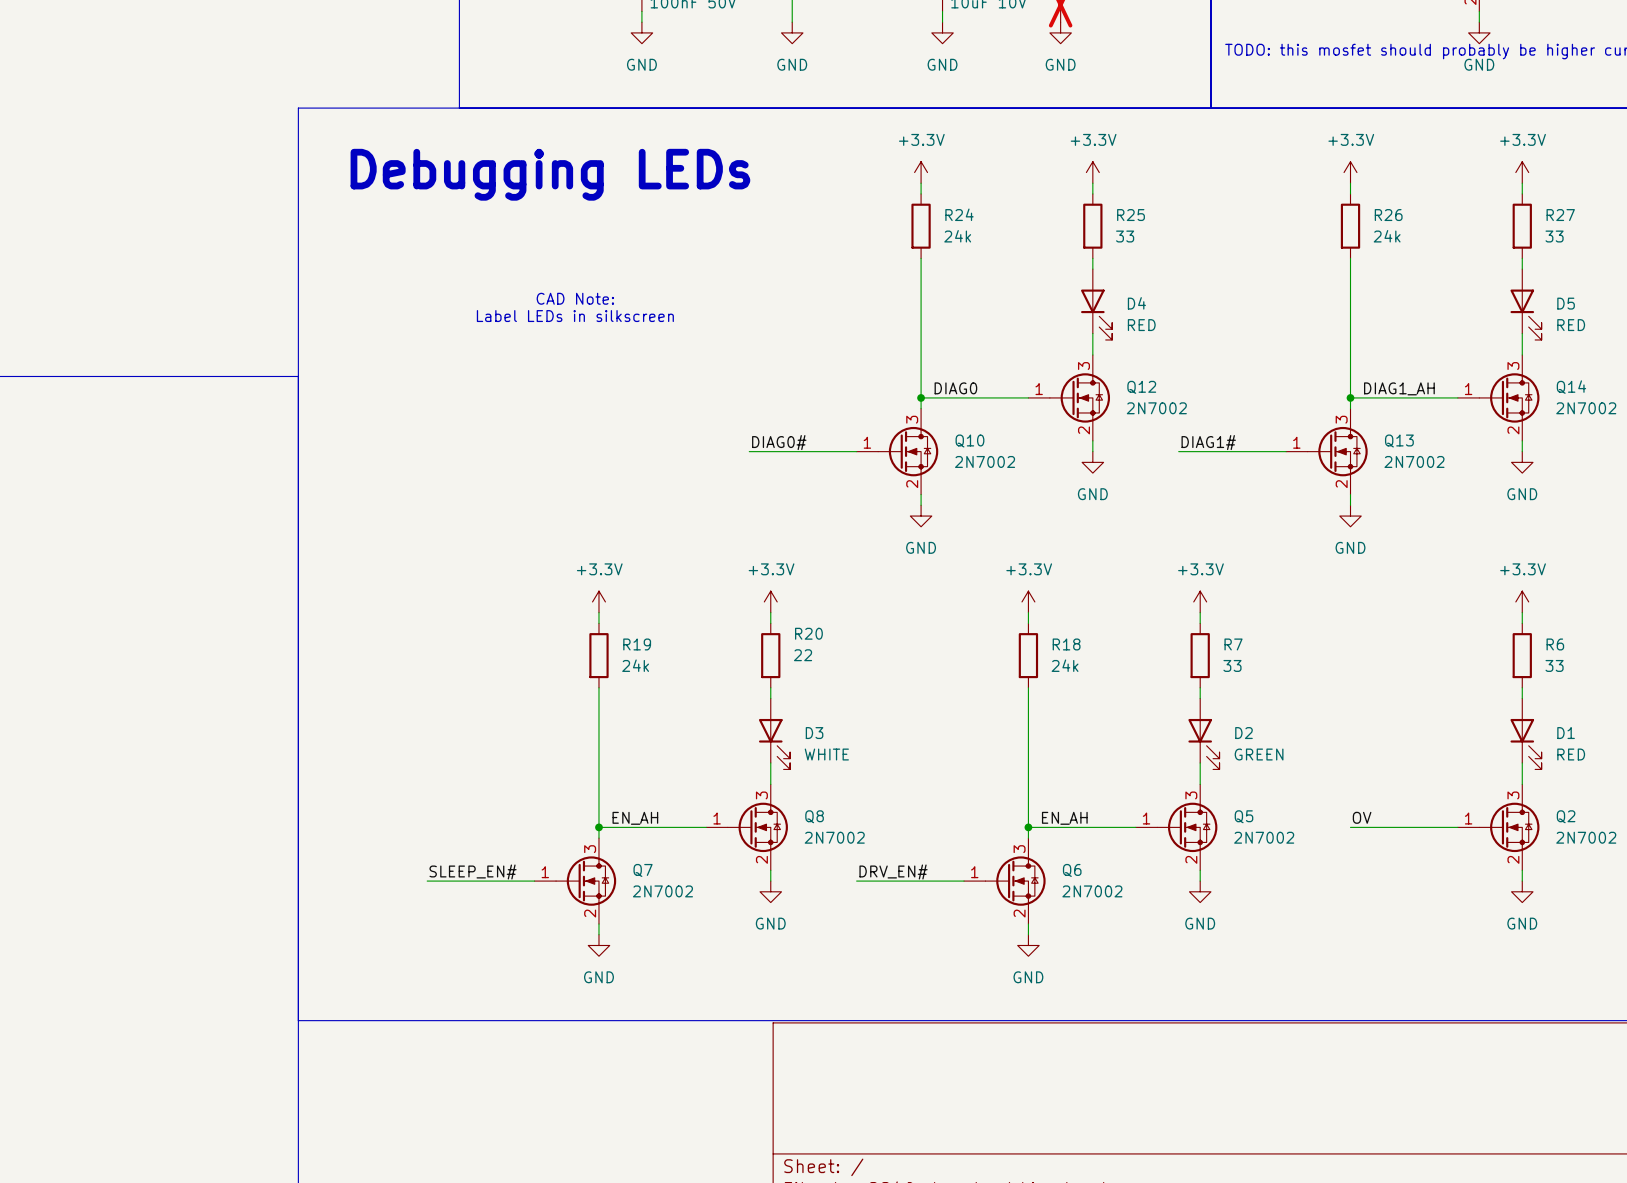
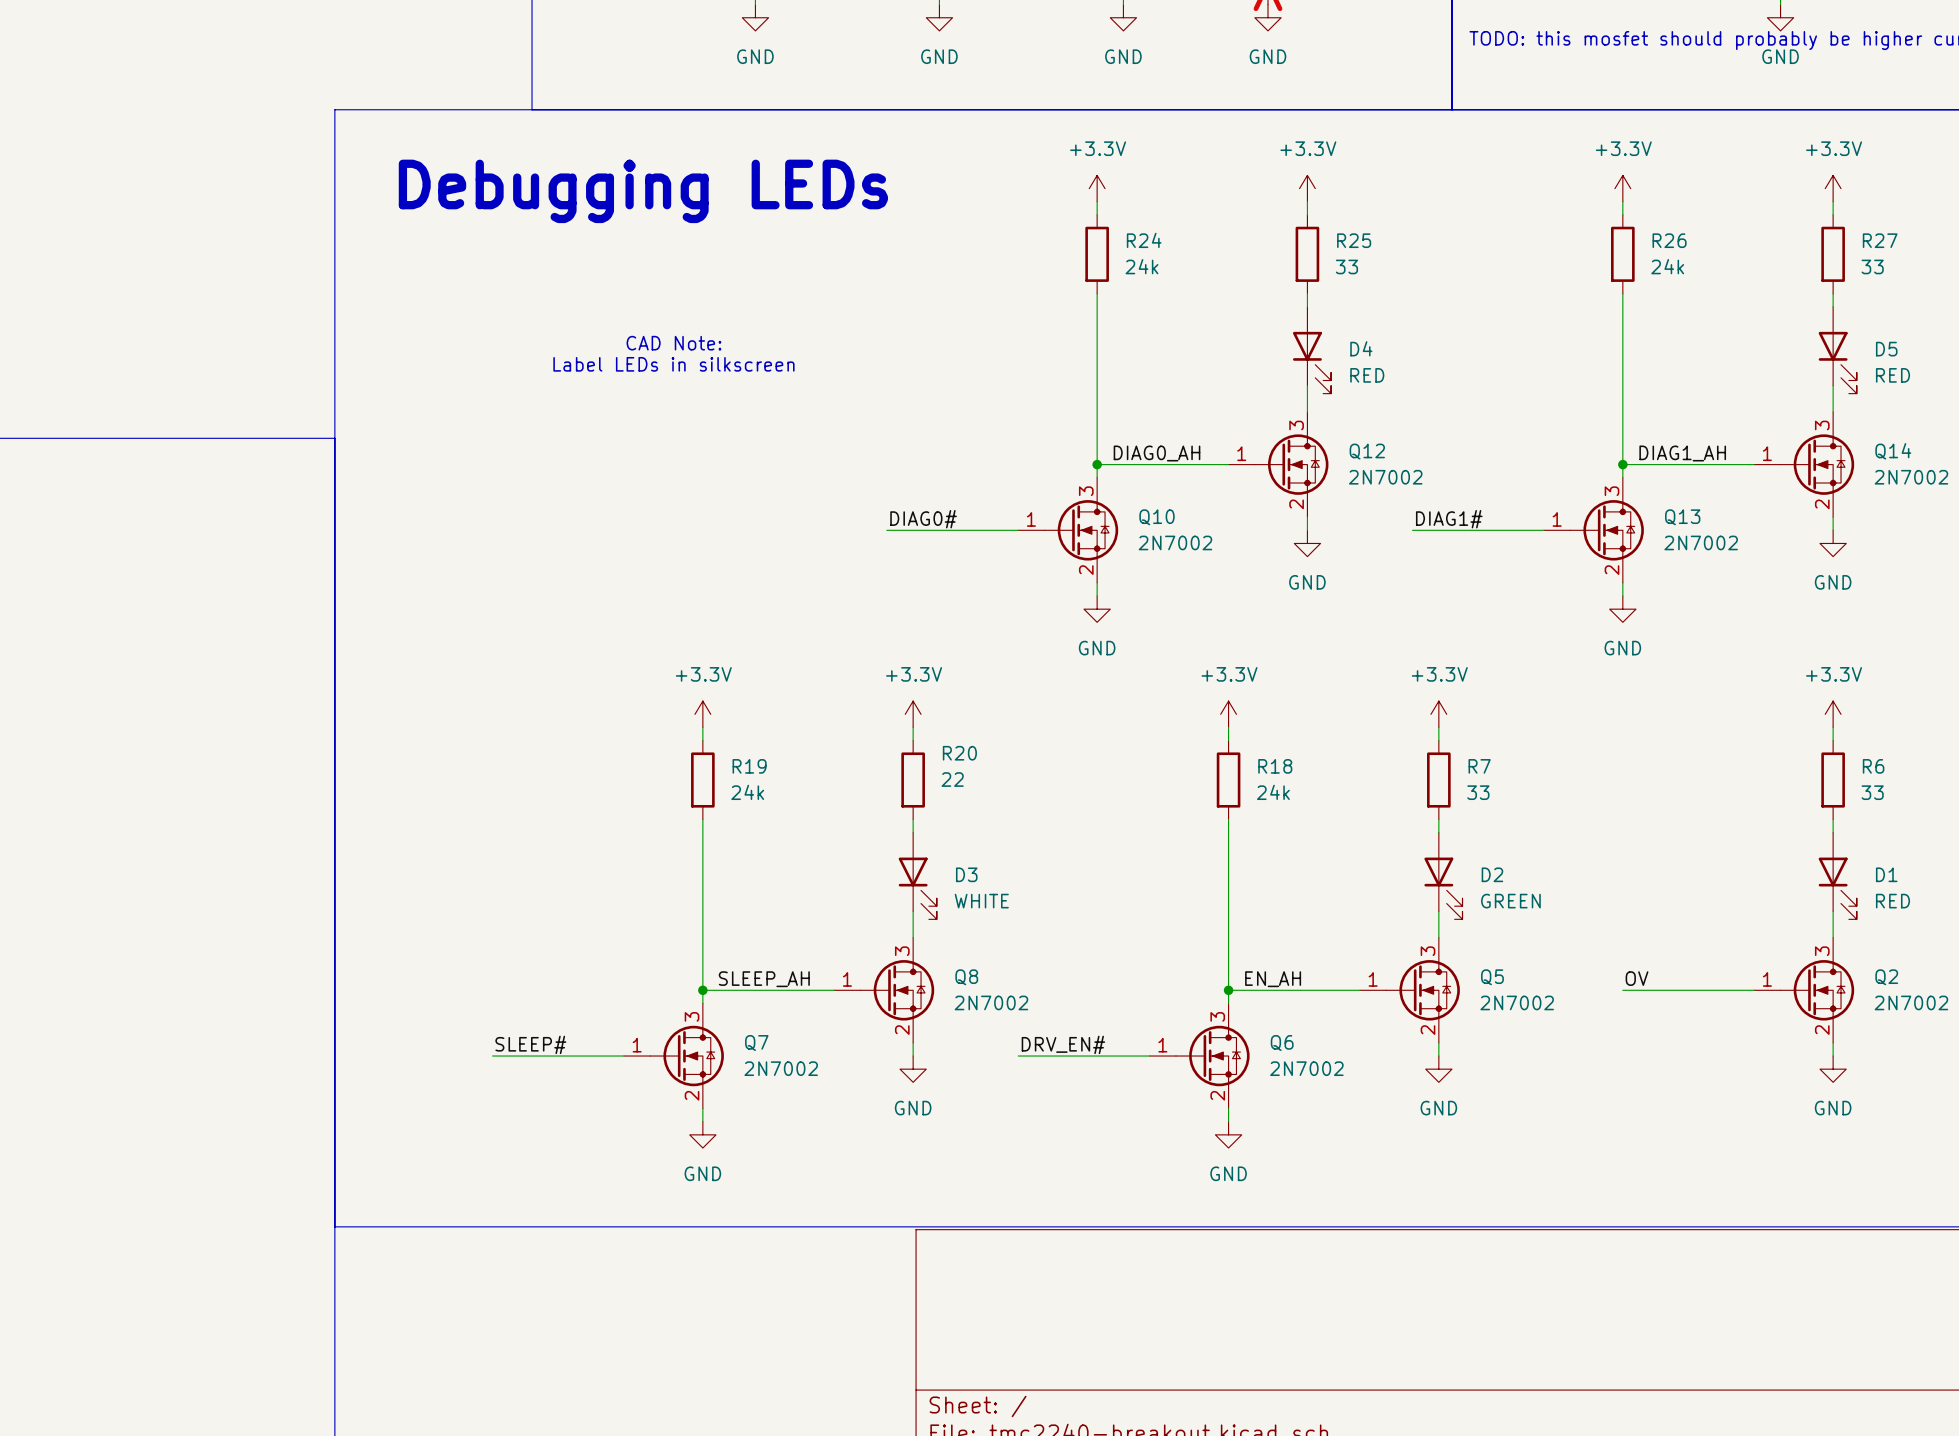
label: DIAG0 (955, 388) -> DIAG0_AH (1157, 453)
label: EN_AH (635, 818) -> SLEEP_AH (764, 979)
label: SLEEP_EN# (473, 872) -> SLEEP# (530, 1044)

